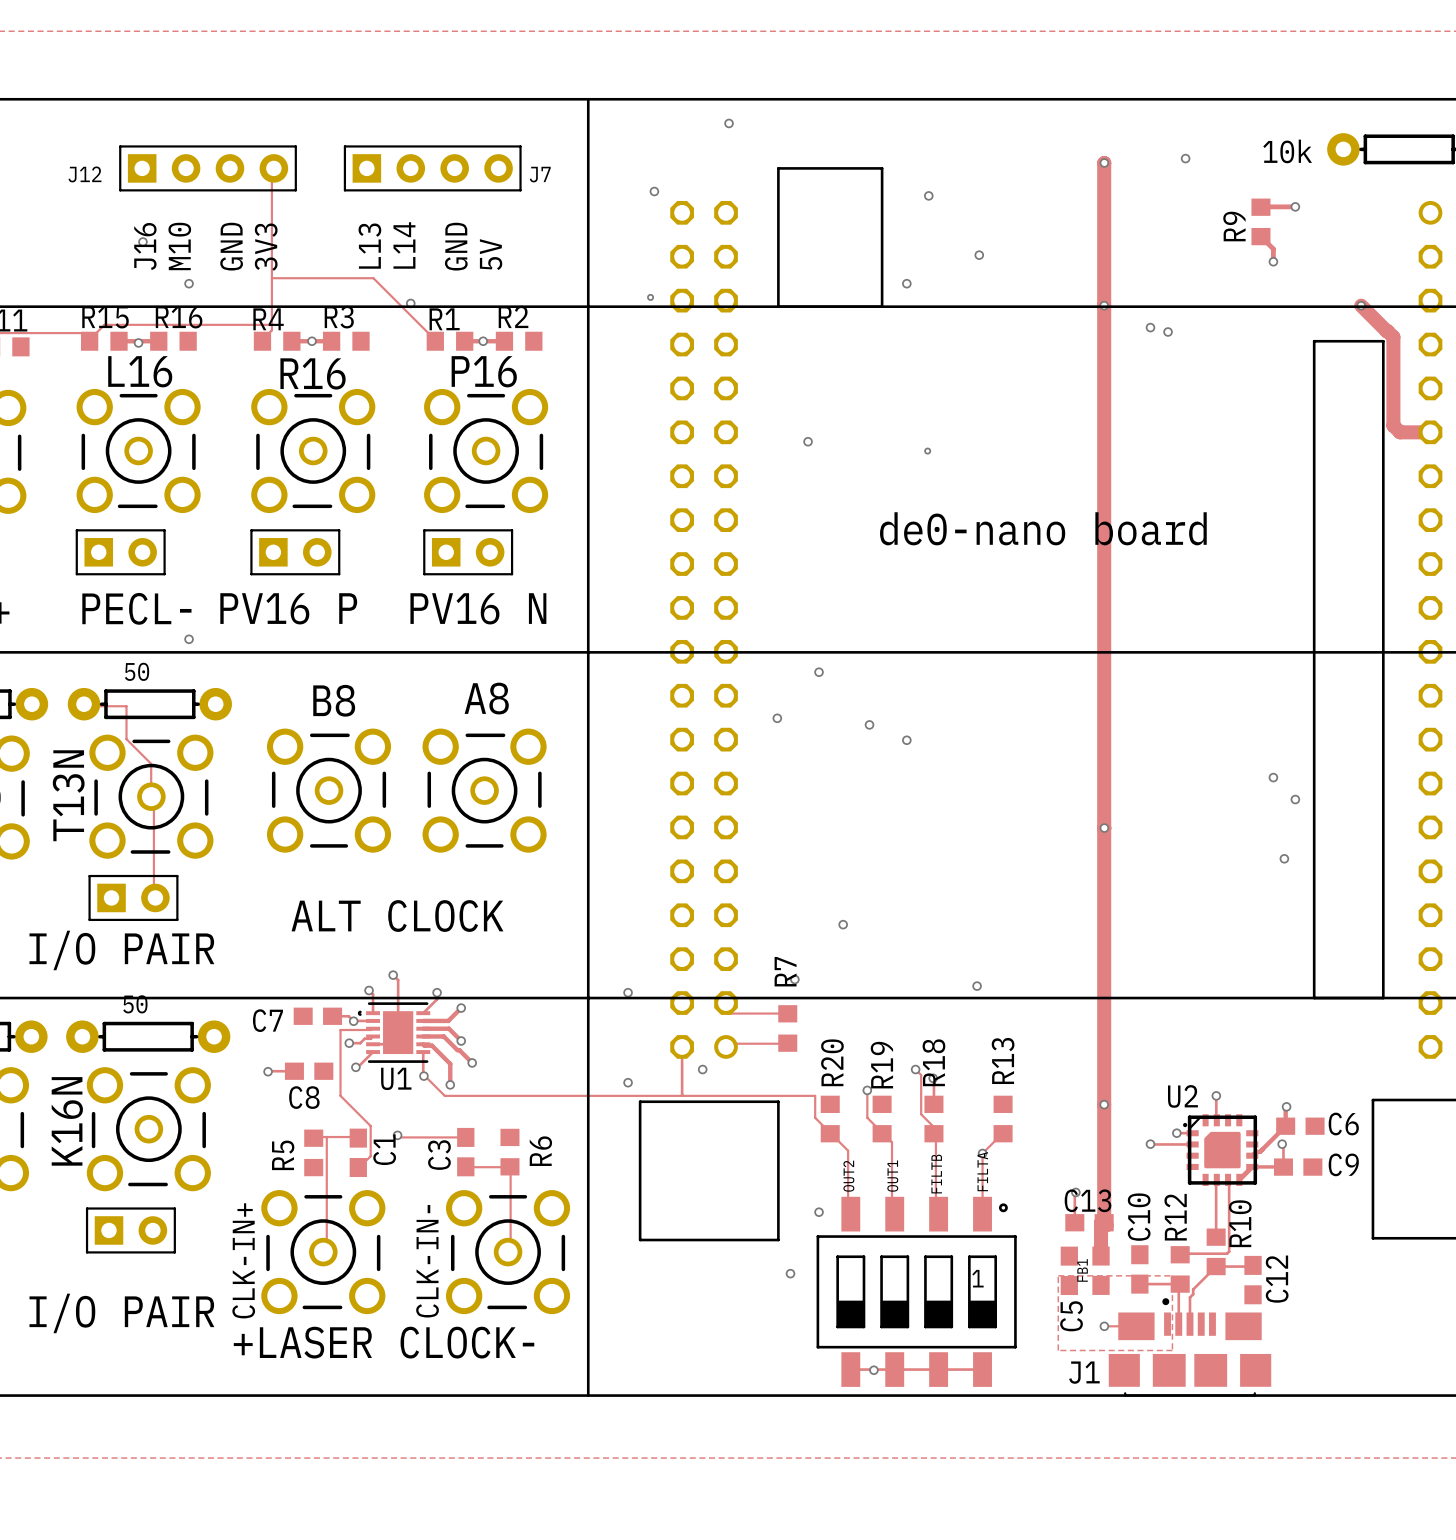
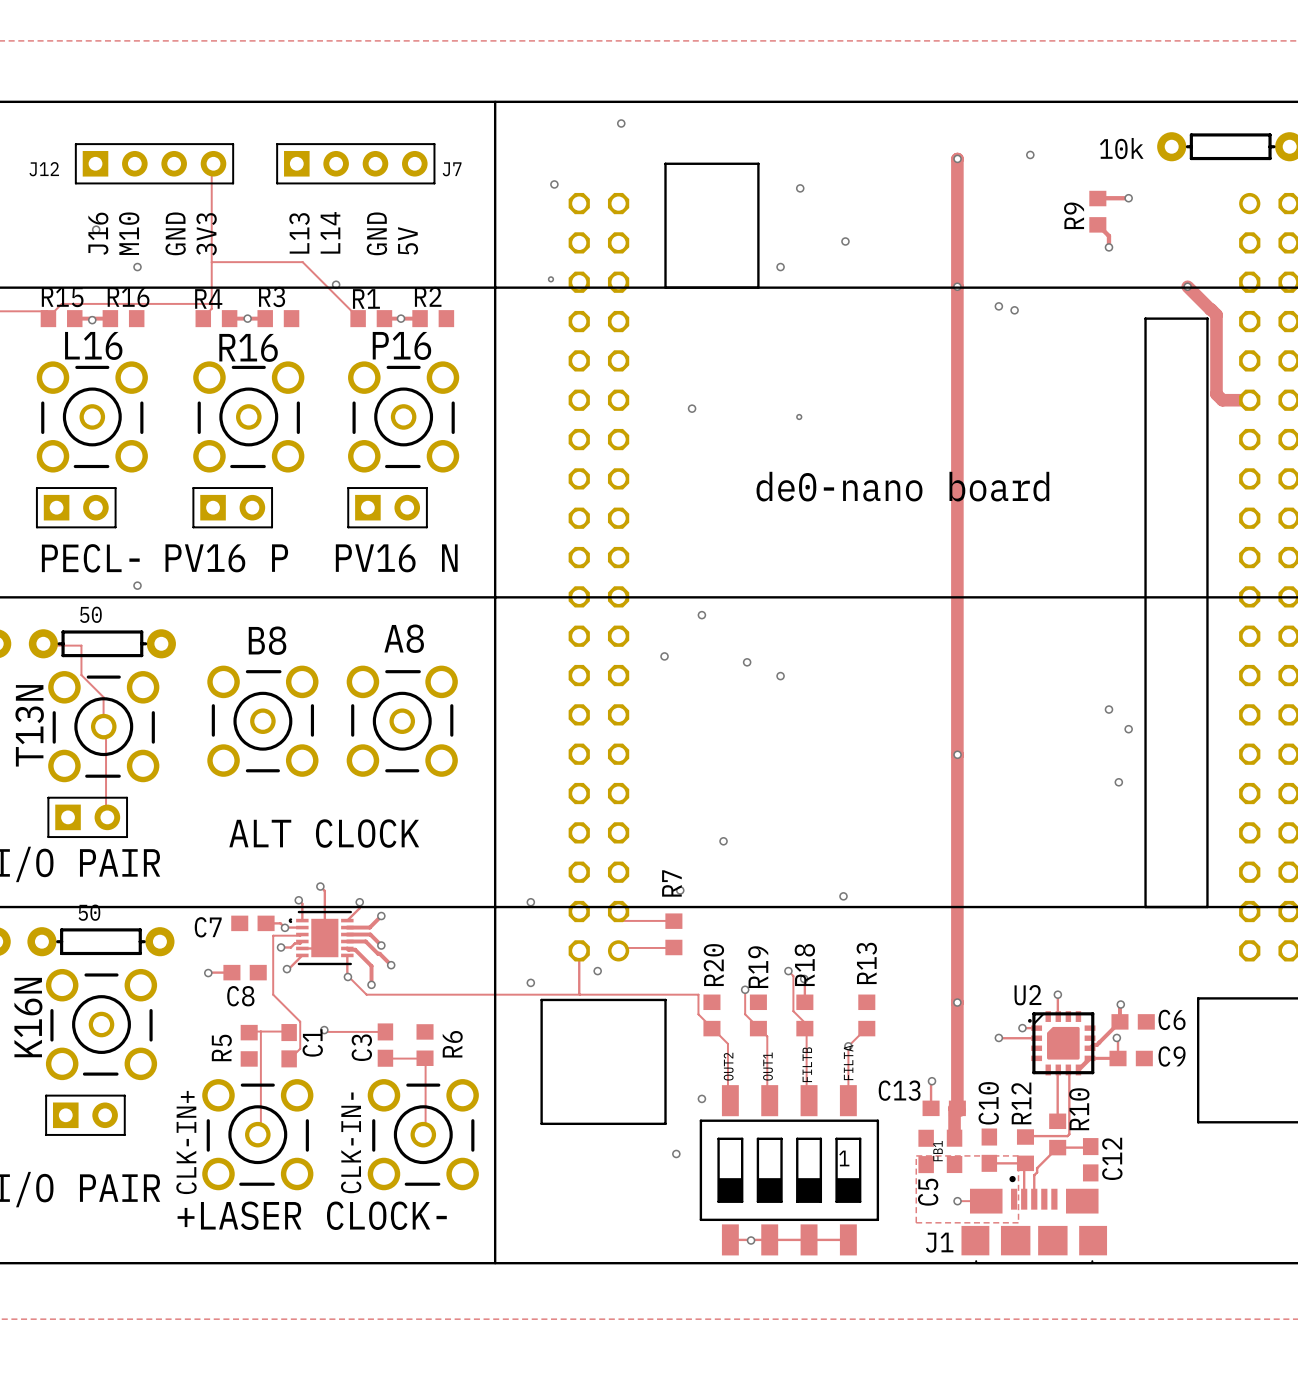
U1 name: U1 (396, 1078) -> none
C13 name position: C13 (1088, 1200) -> C13 (899, 1090)
drawing: [998, 1203, 1008, 1213] -> none

